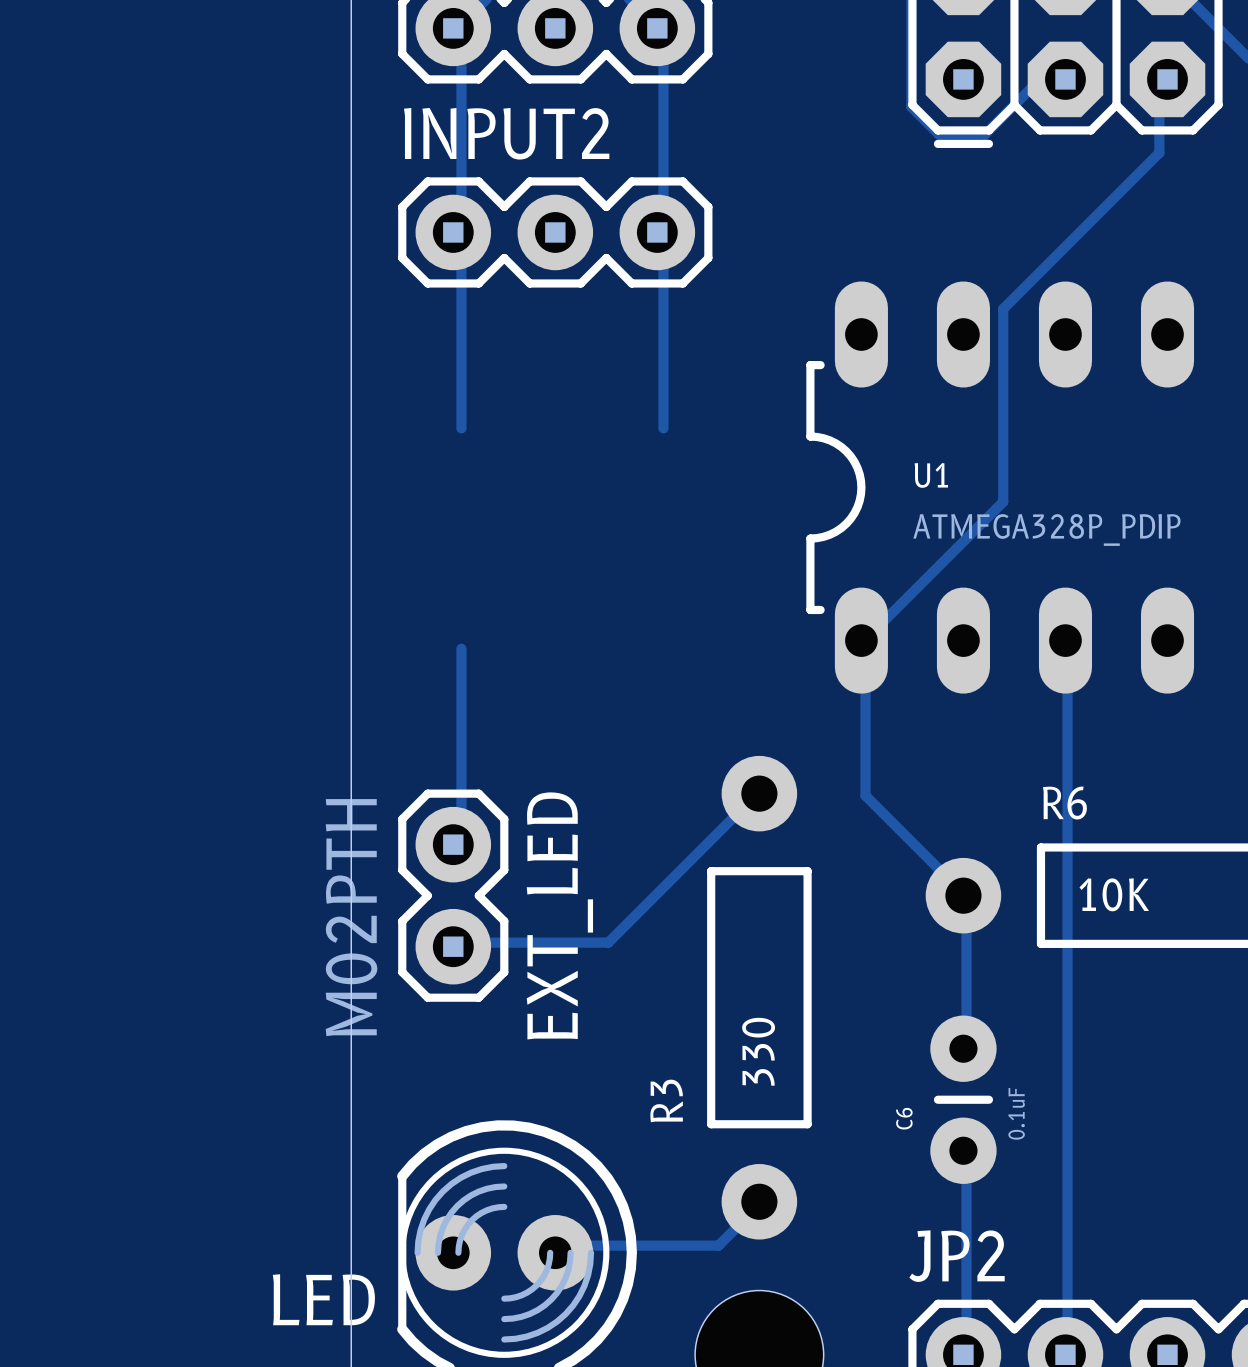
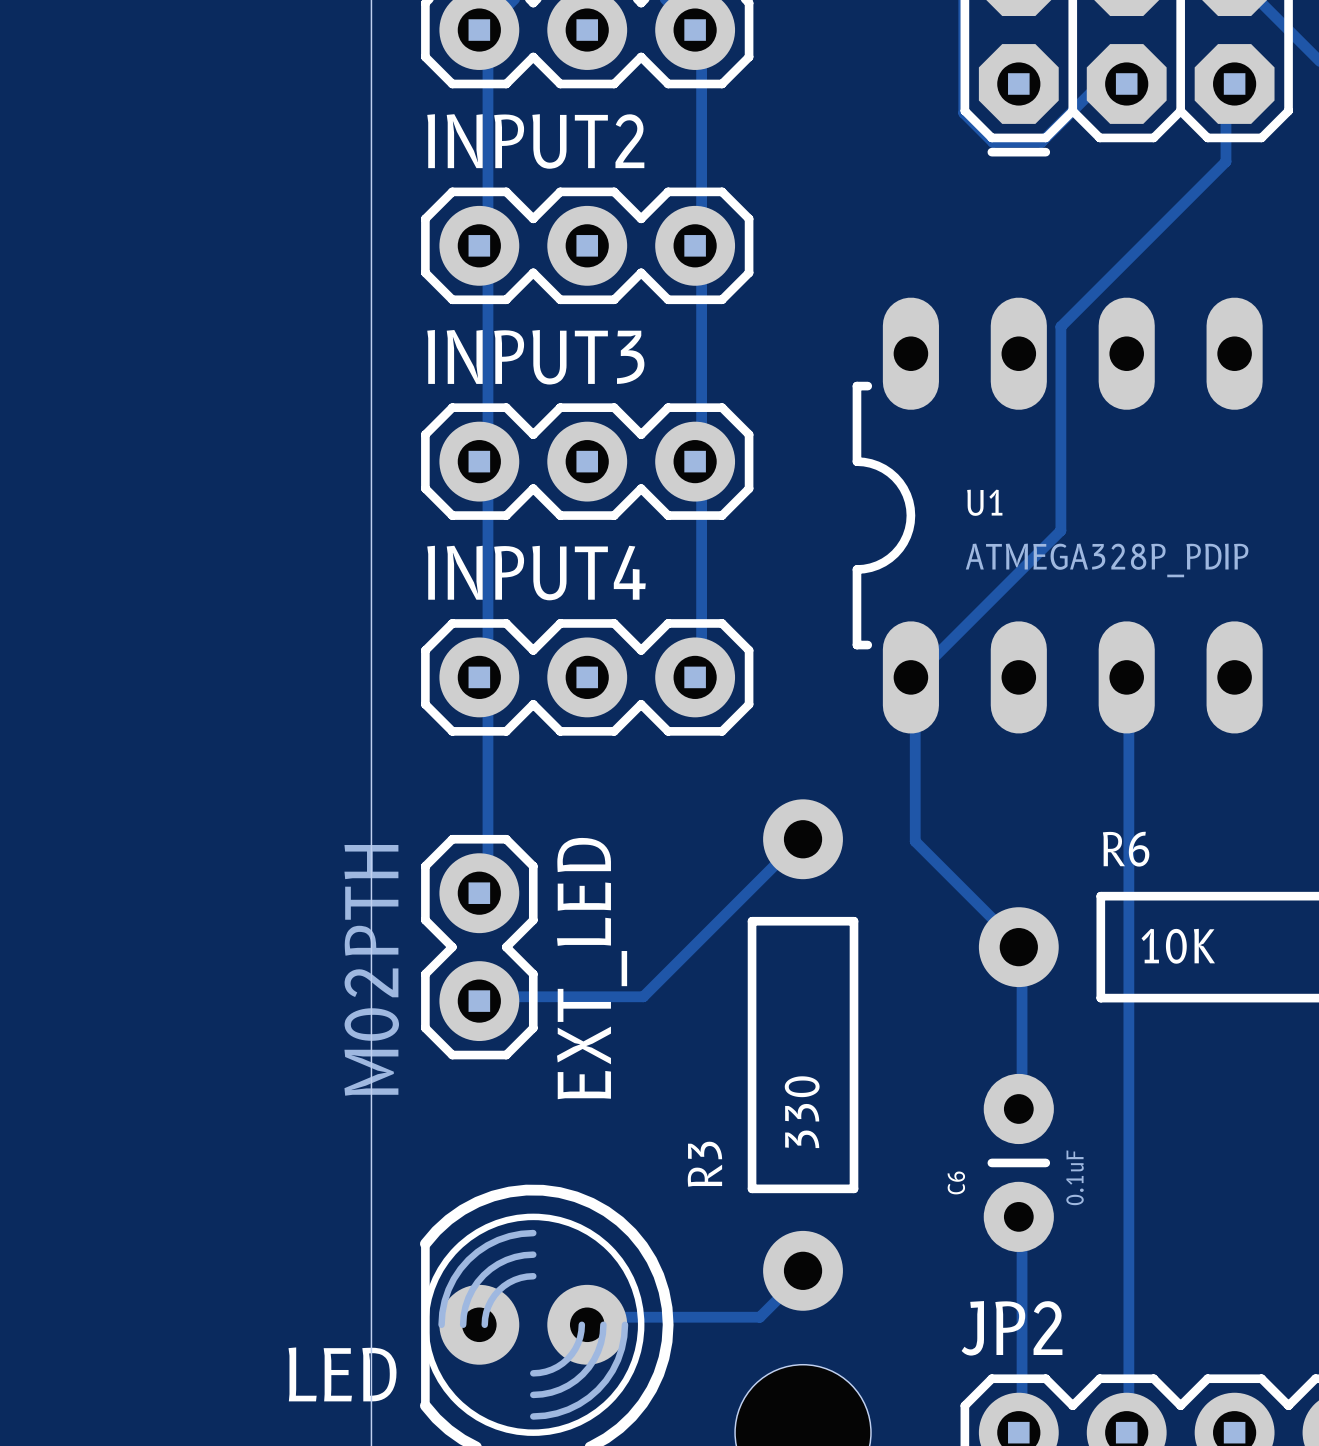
track: none -> (487, 452) (479, 461) (487, 462) (487, 676) (479, 677) (487, 686)
track: none -> (701, 452) (695, 461) (701, 462) (701, 676) (695, 677)
INPUT3: none -> (587, 461)
INPUT4: none -> (587, 677)

